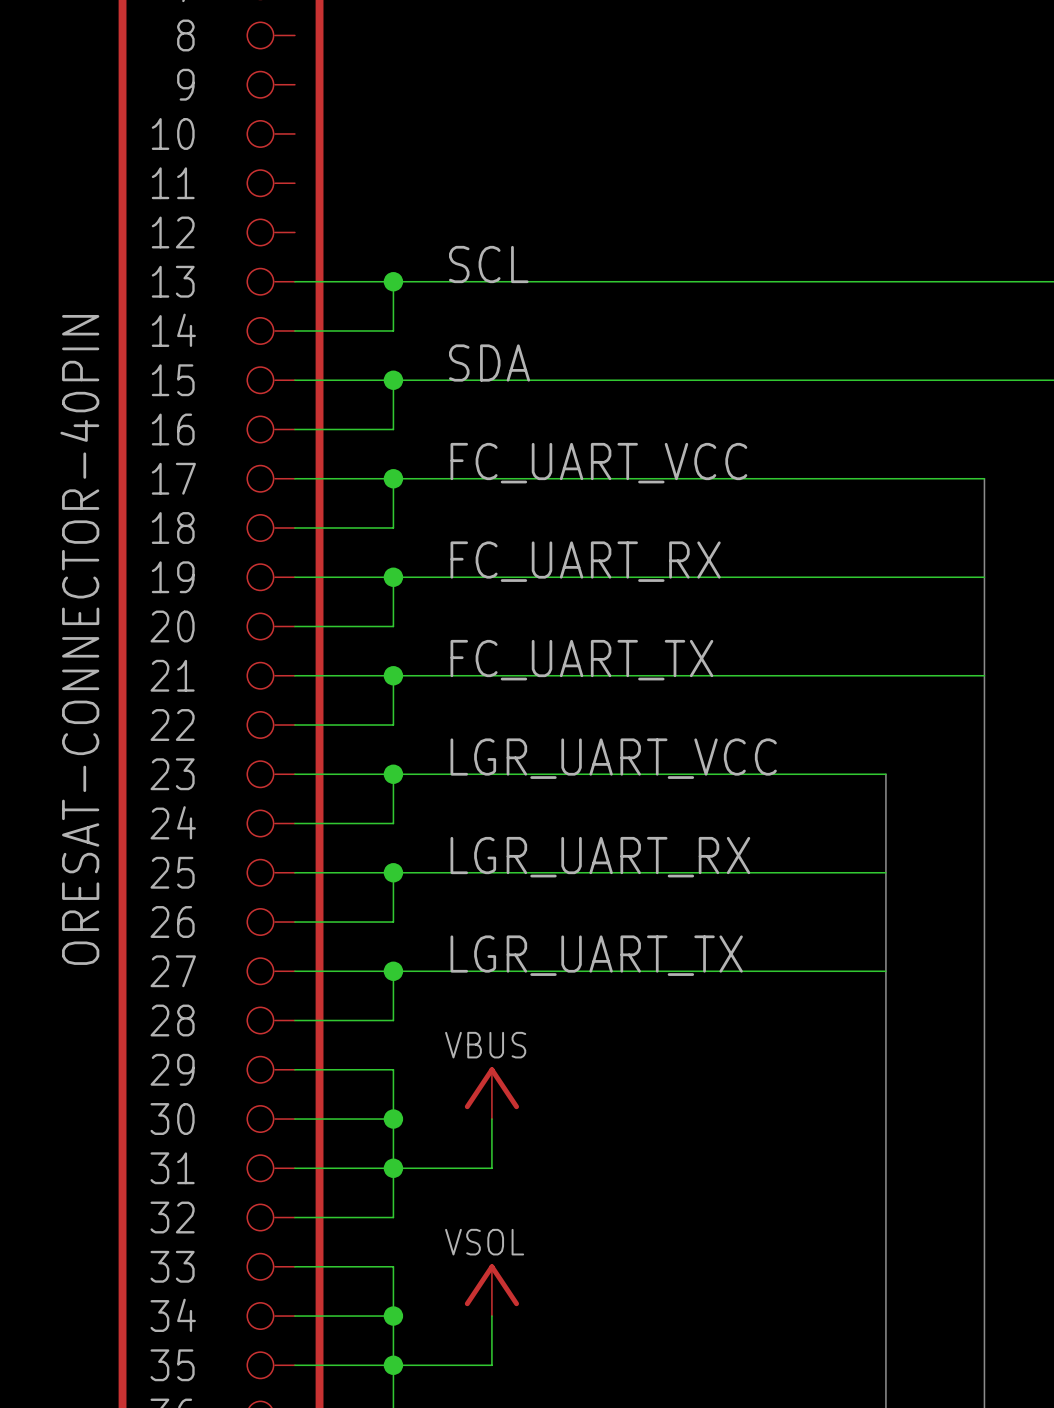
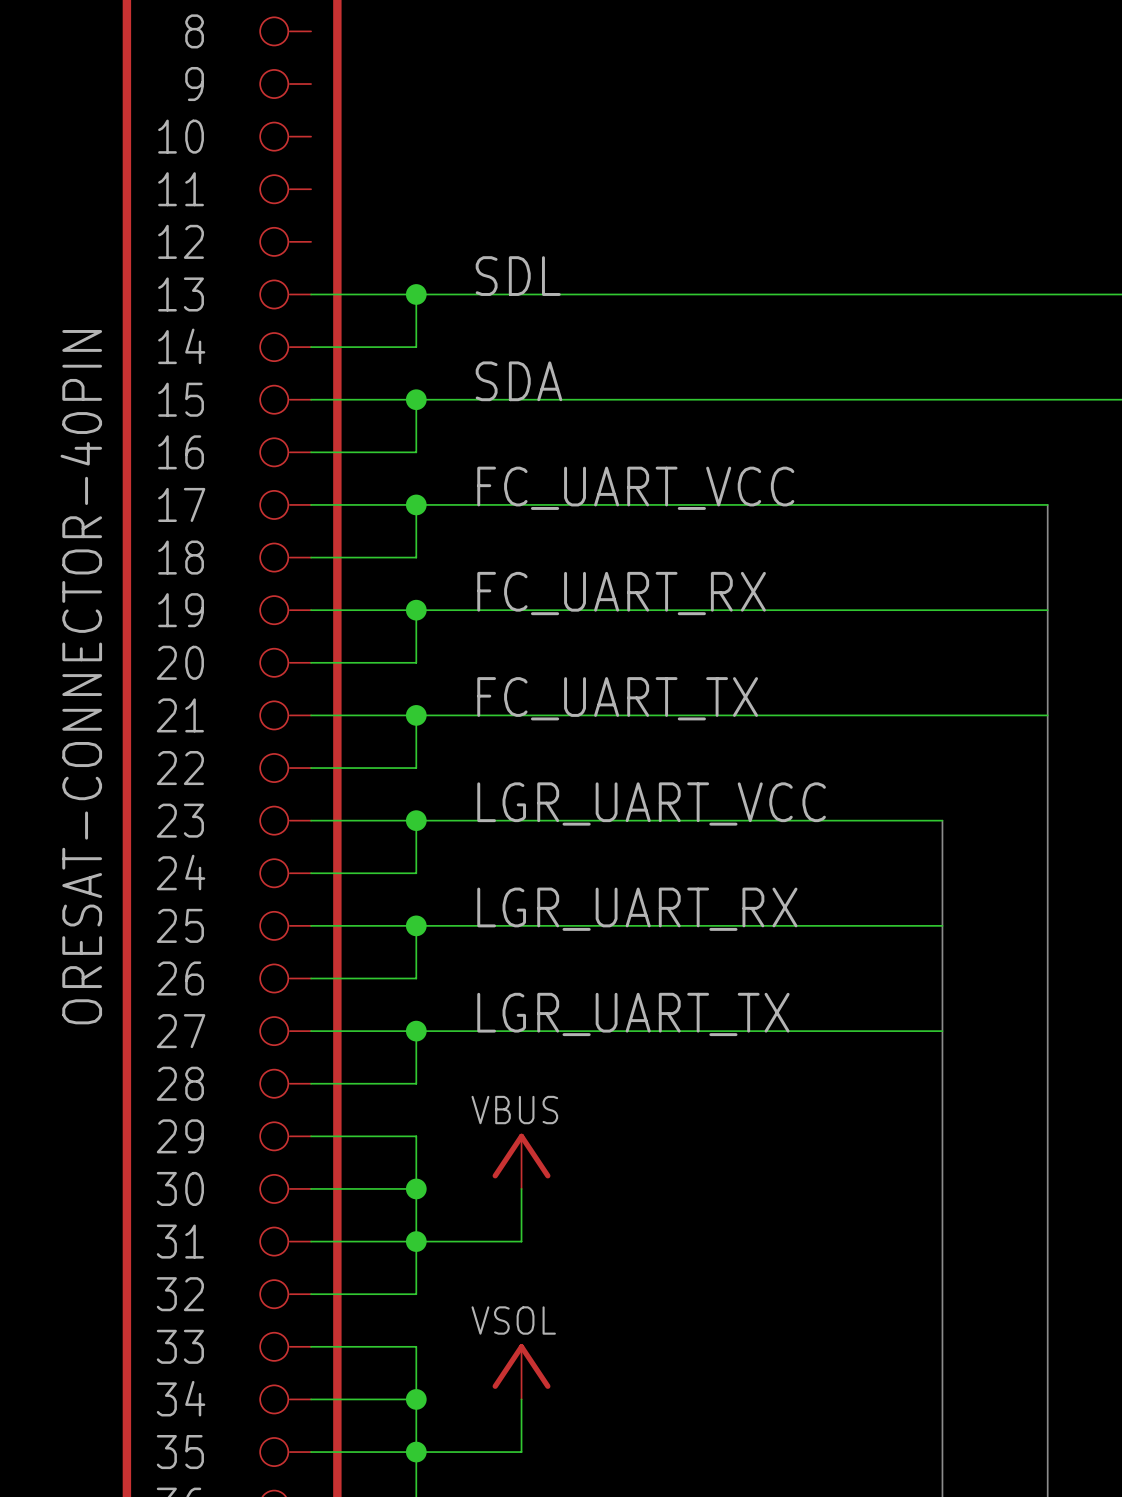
label: SCL (488, 264) -> SDL (518, 276)

